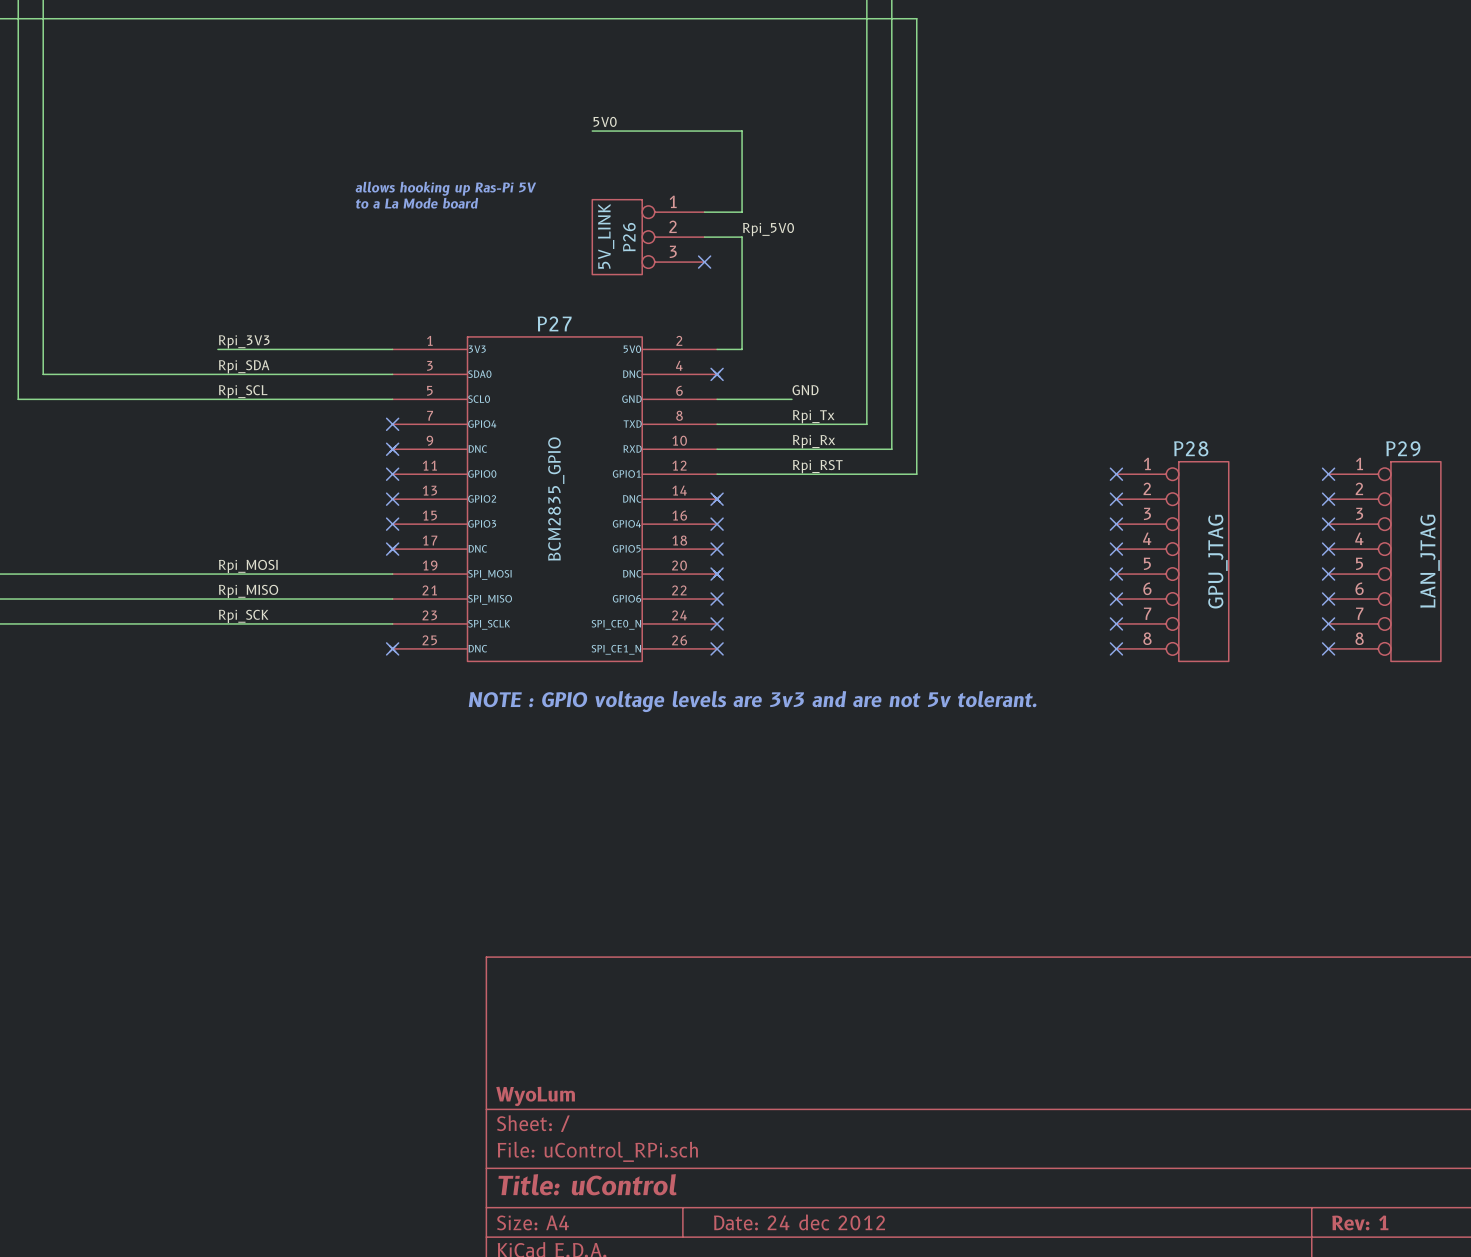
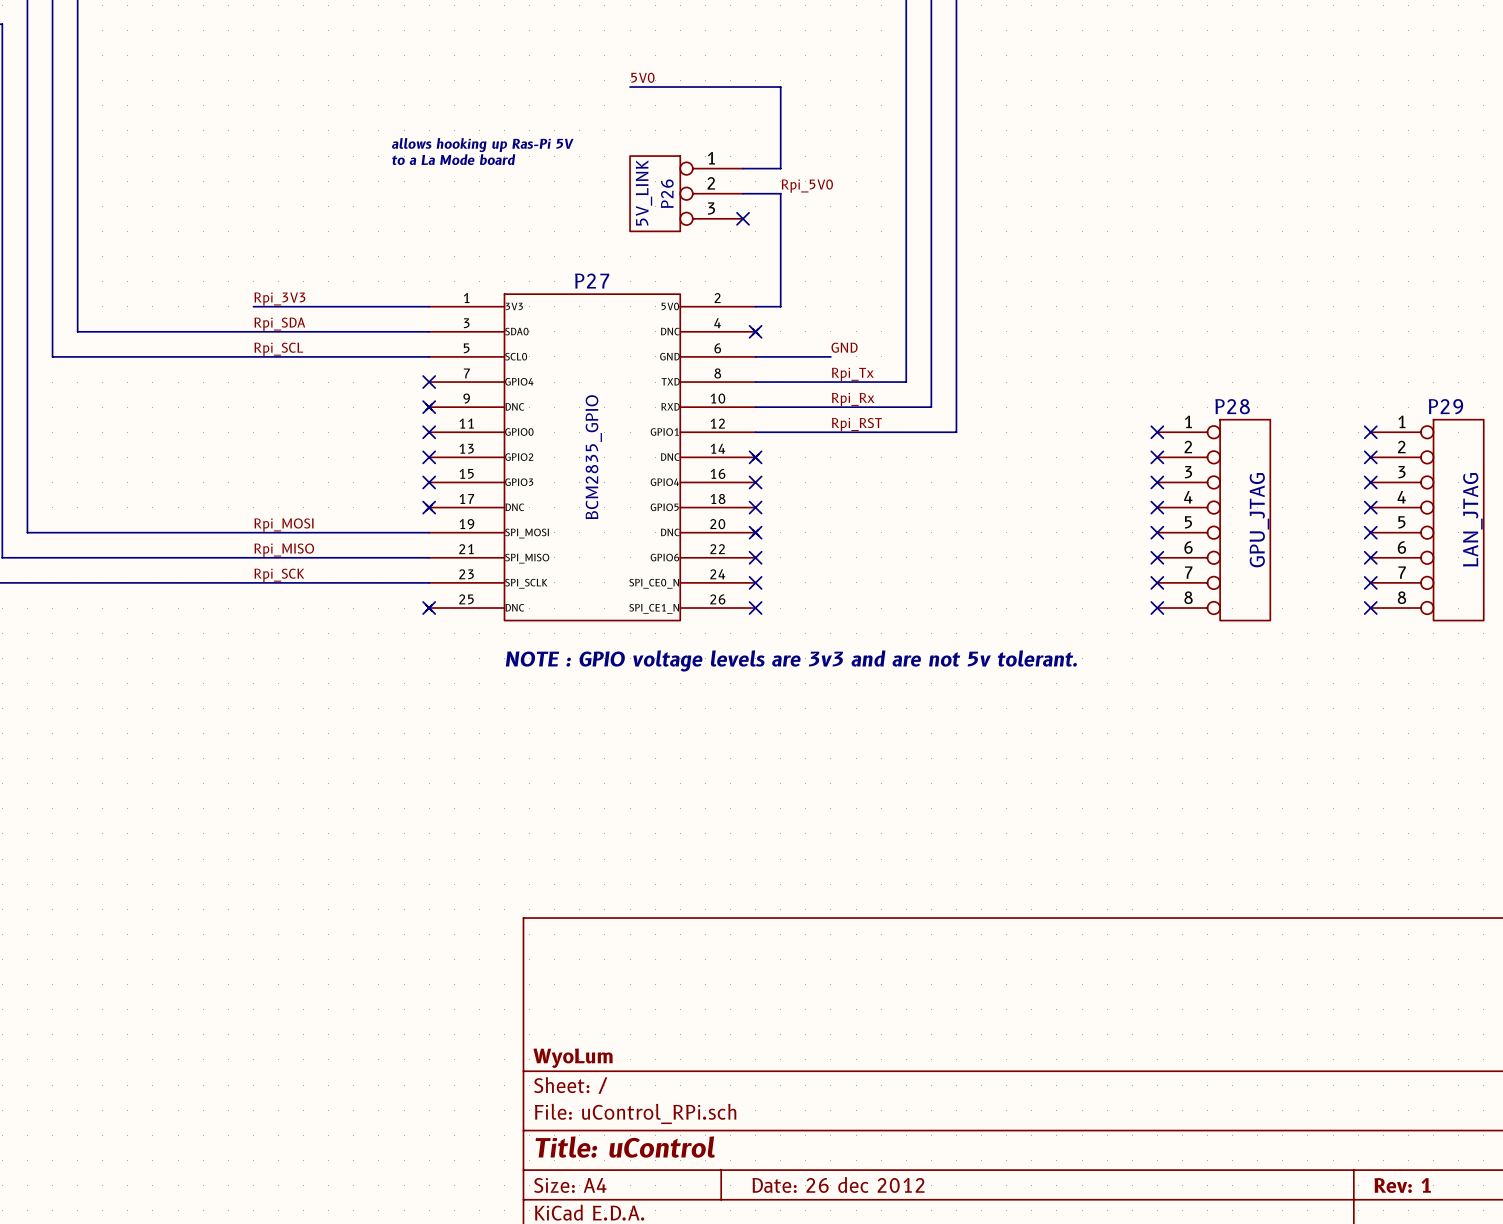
title block: Date: 24 dec 2012 (799, 1222) -> Date: 26 dec 2012 (838, 1184)

